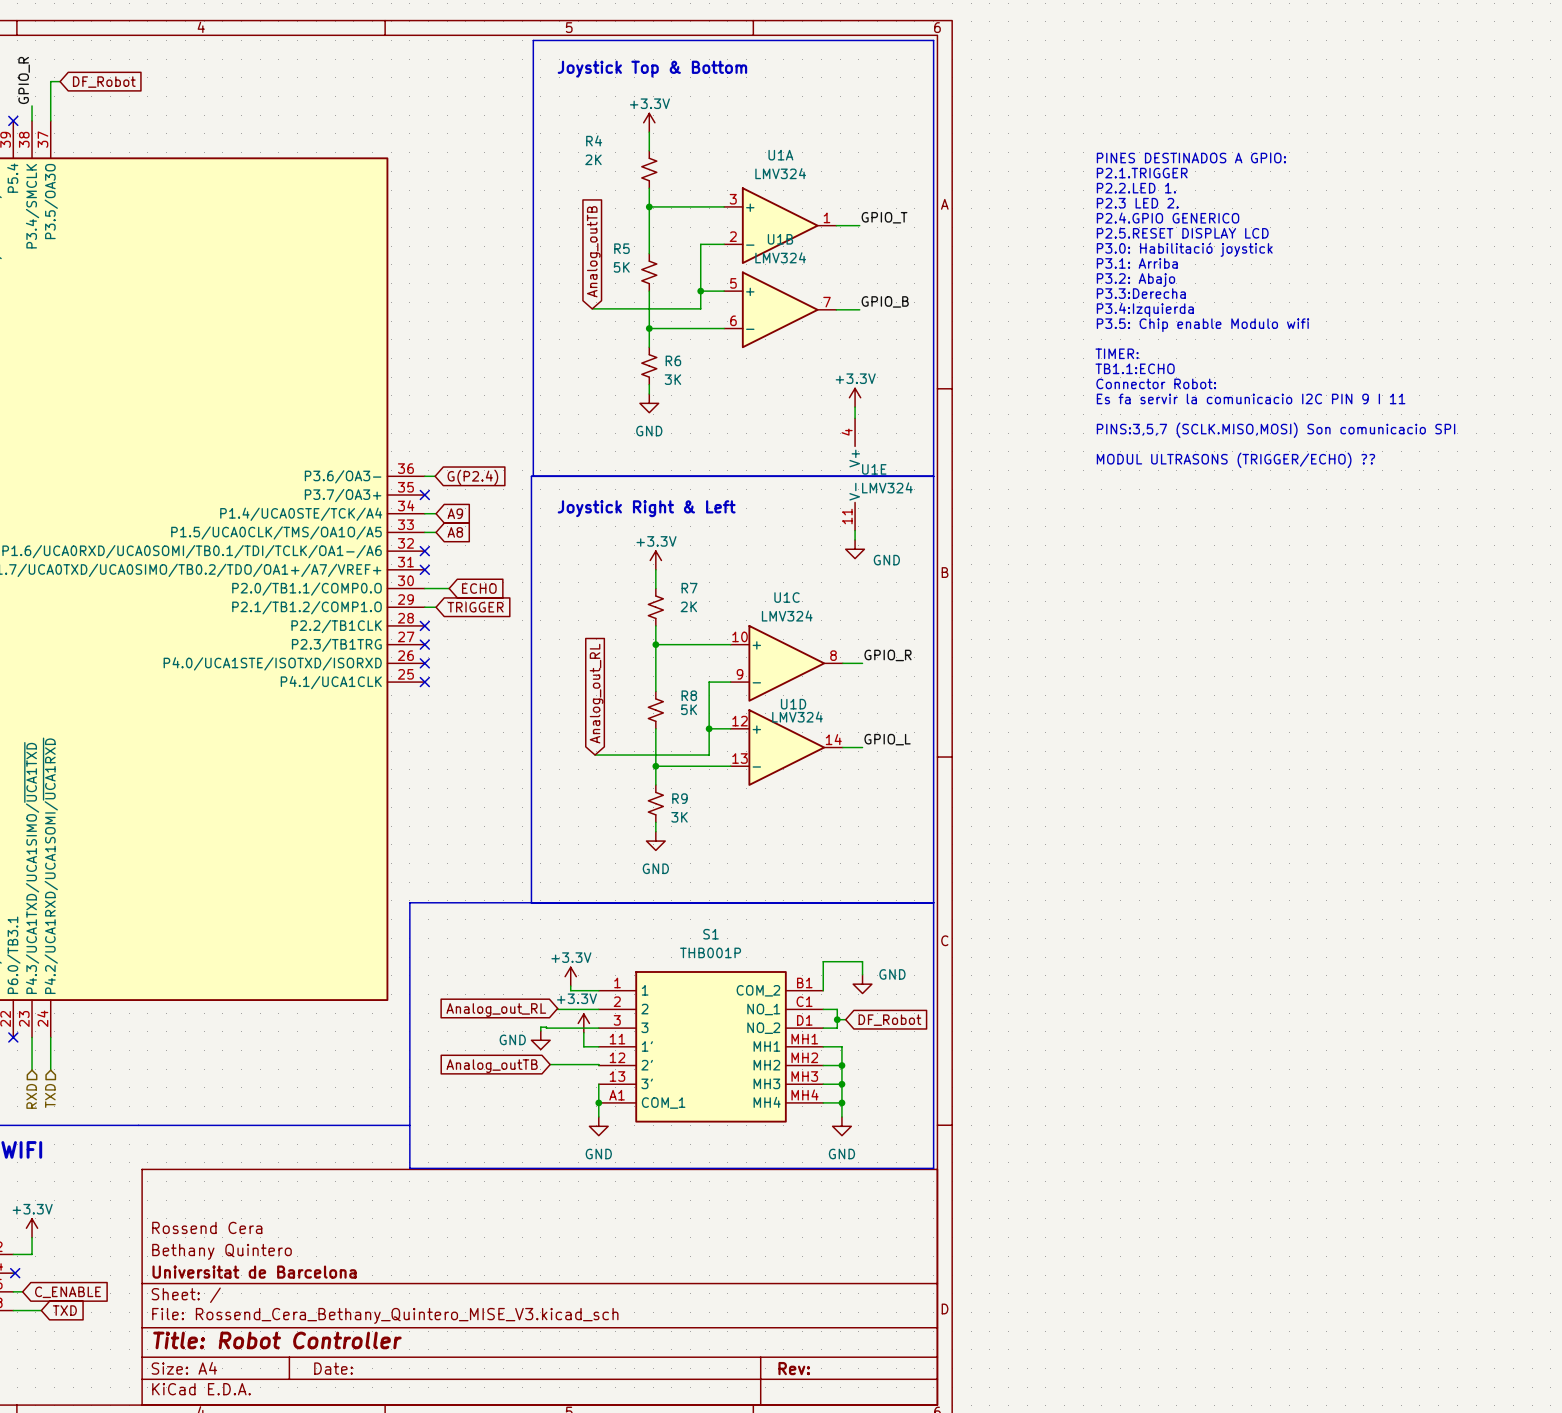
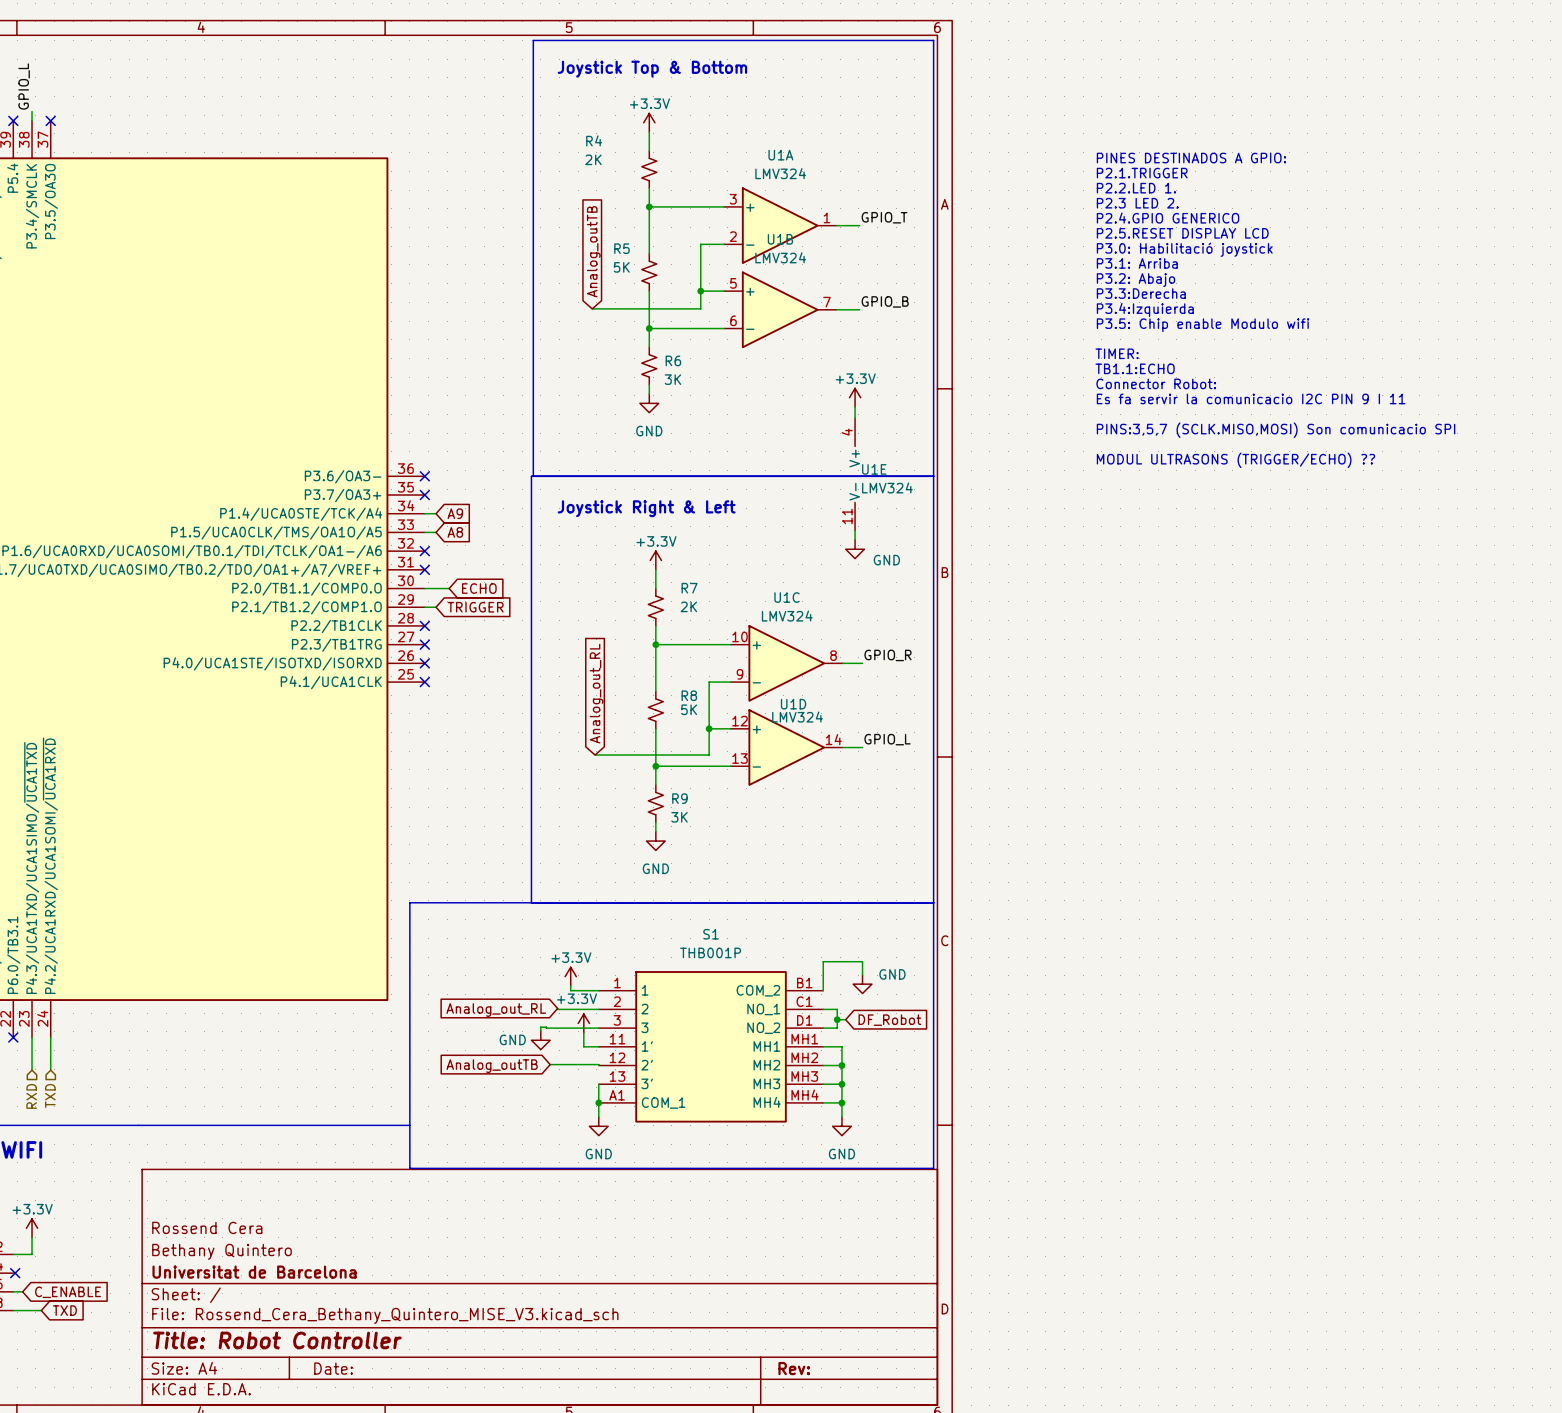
label: GPIO_R (24, 80) -> GPIO_L (24, 86)
wire: (60, 81) (50, 81) (50, 120) -> none
global label: DF_Robot (104, 82) -> none
wire: (32, 105) (32, 111) -> none
no-connect mark: none -> (50, 120)
wire: (424, 476) (435, 476) -> none
no-connect mark: none -> (424, 476)
global label: G(P2.4) (472, 477) -> none

